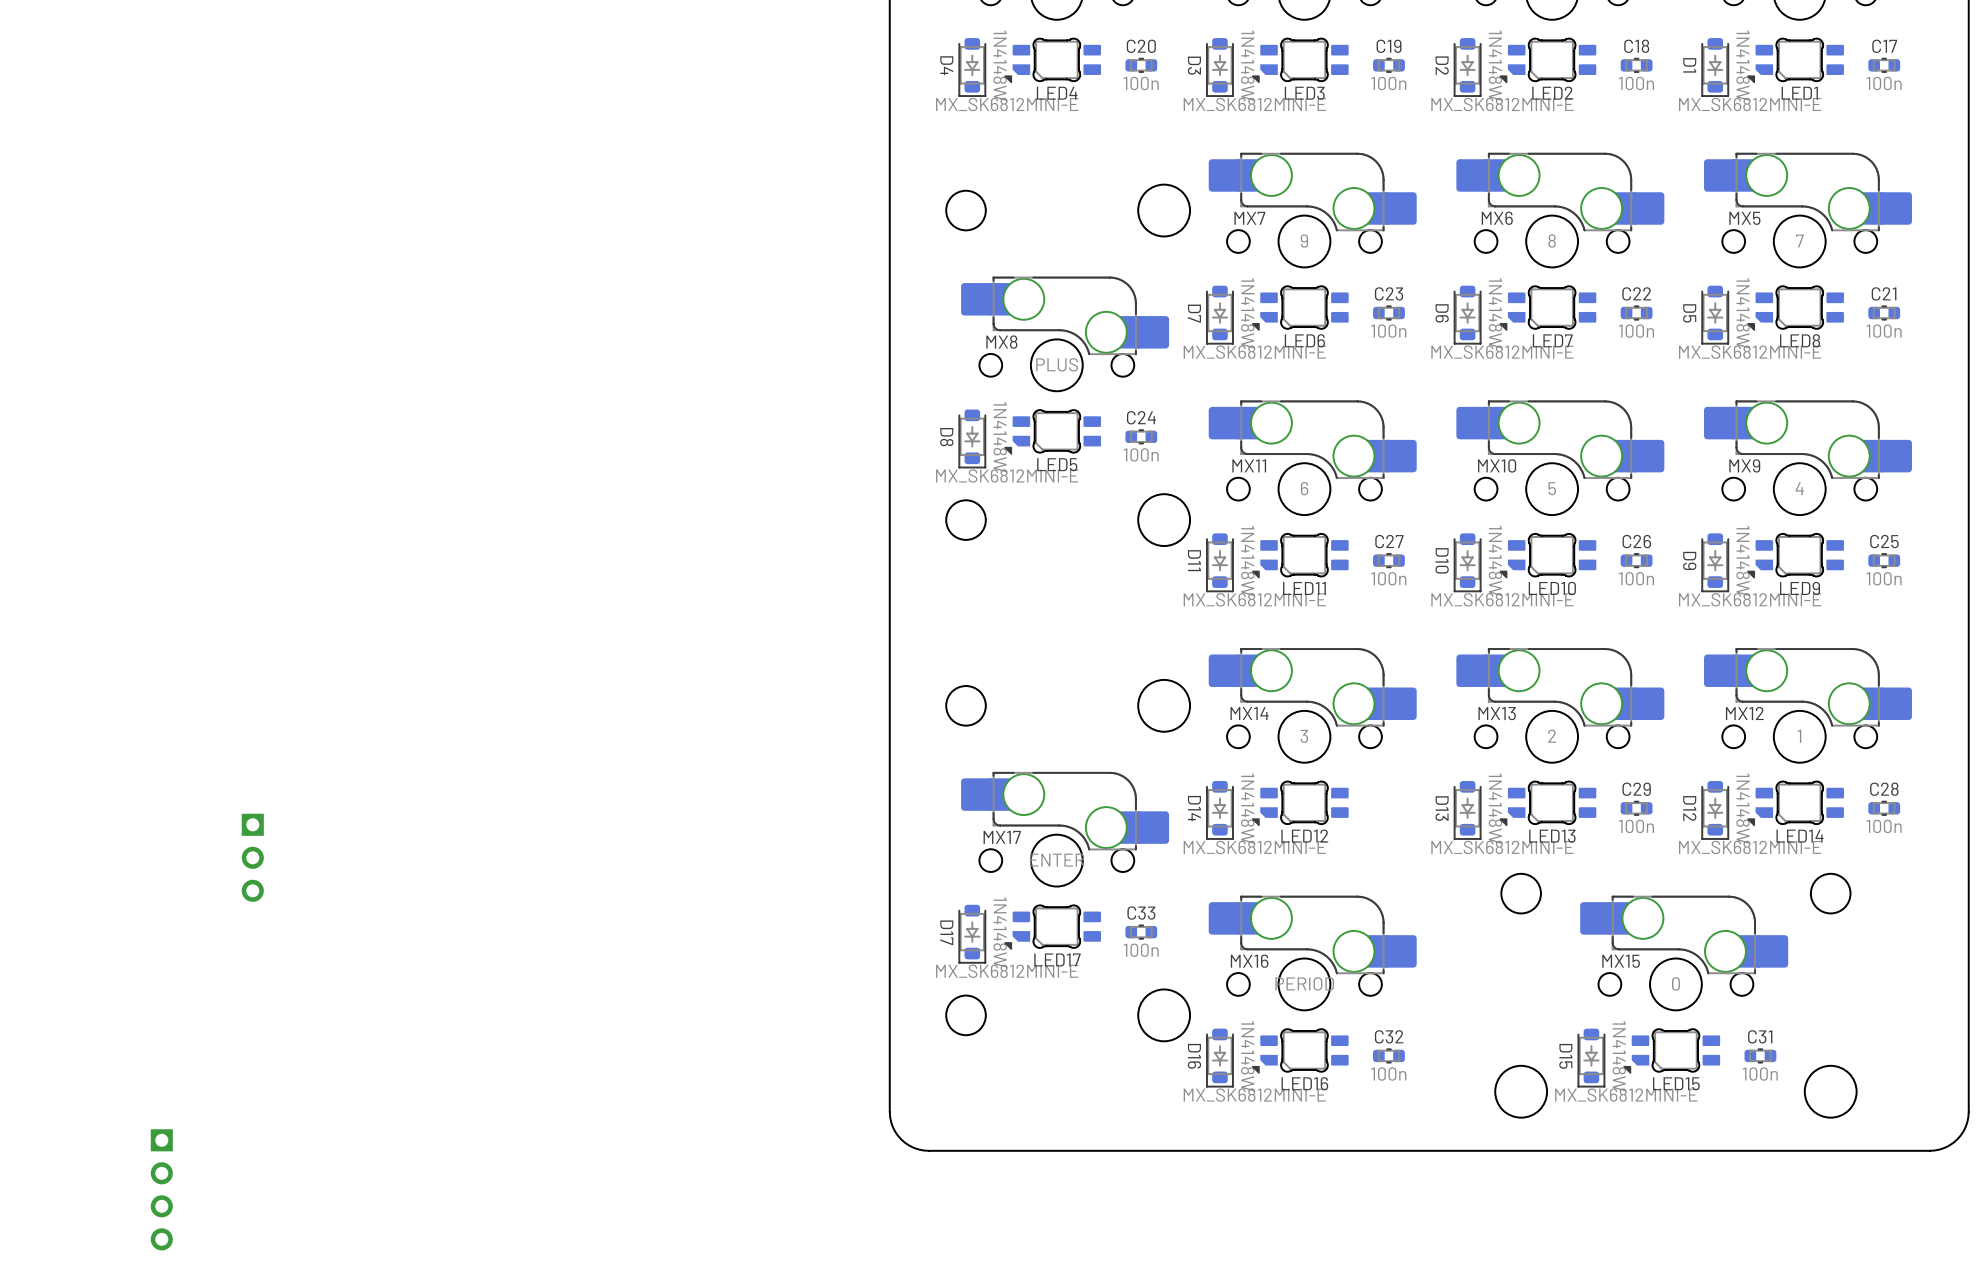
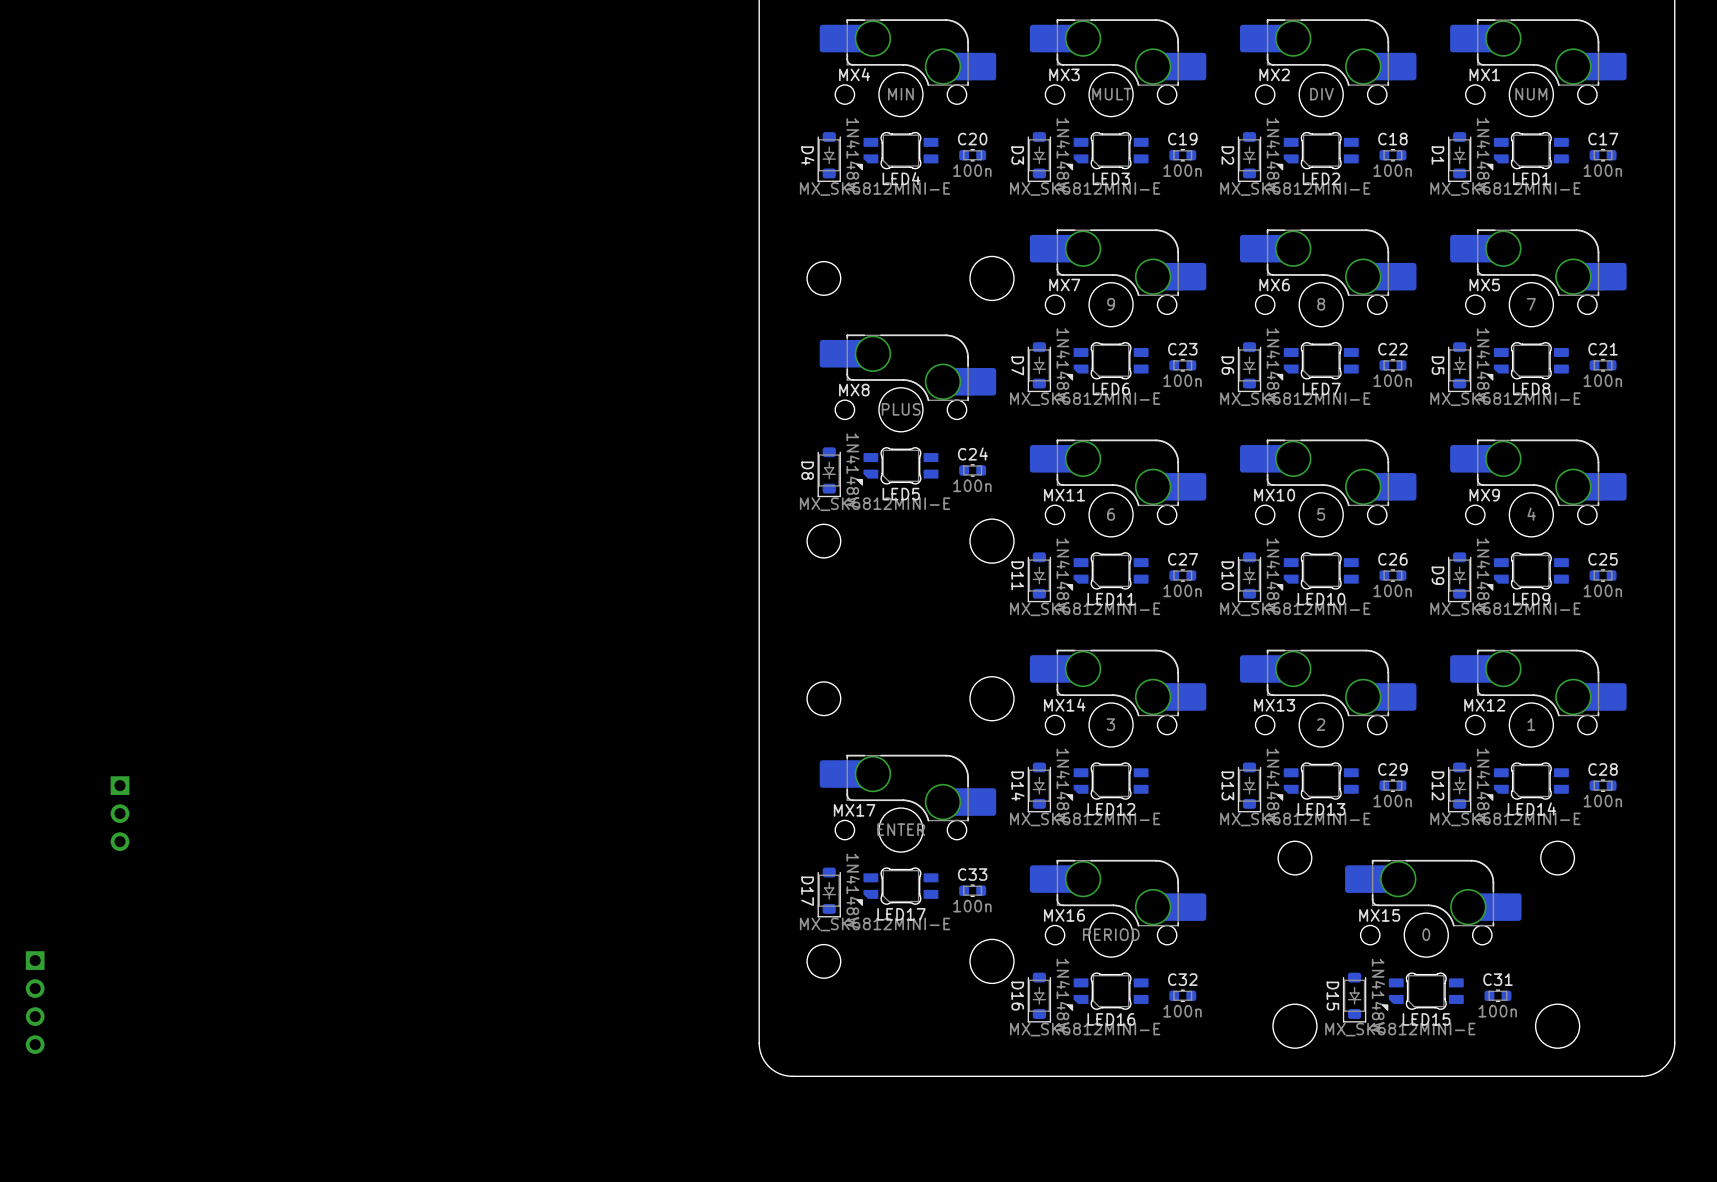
part position: (252, 857) -> (120, 813)
part position: (161, 1189) -> (35, 1002)

